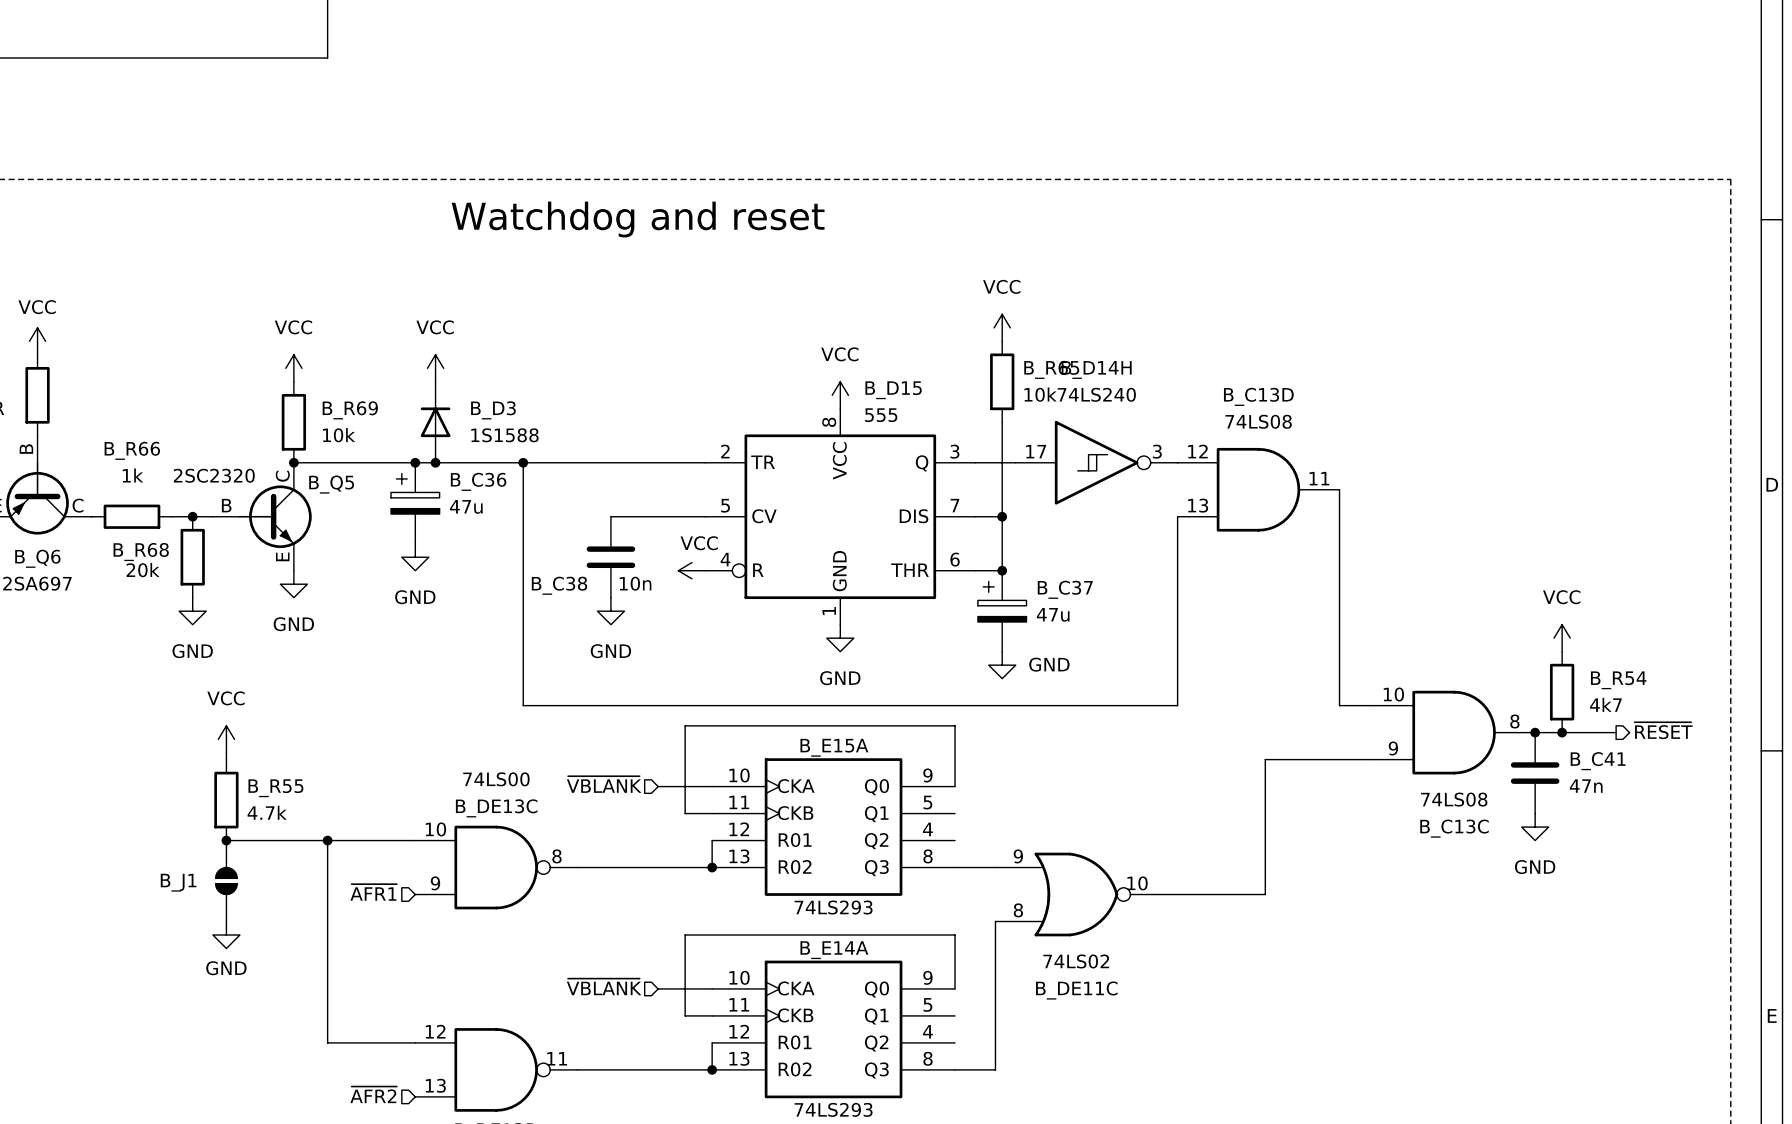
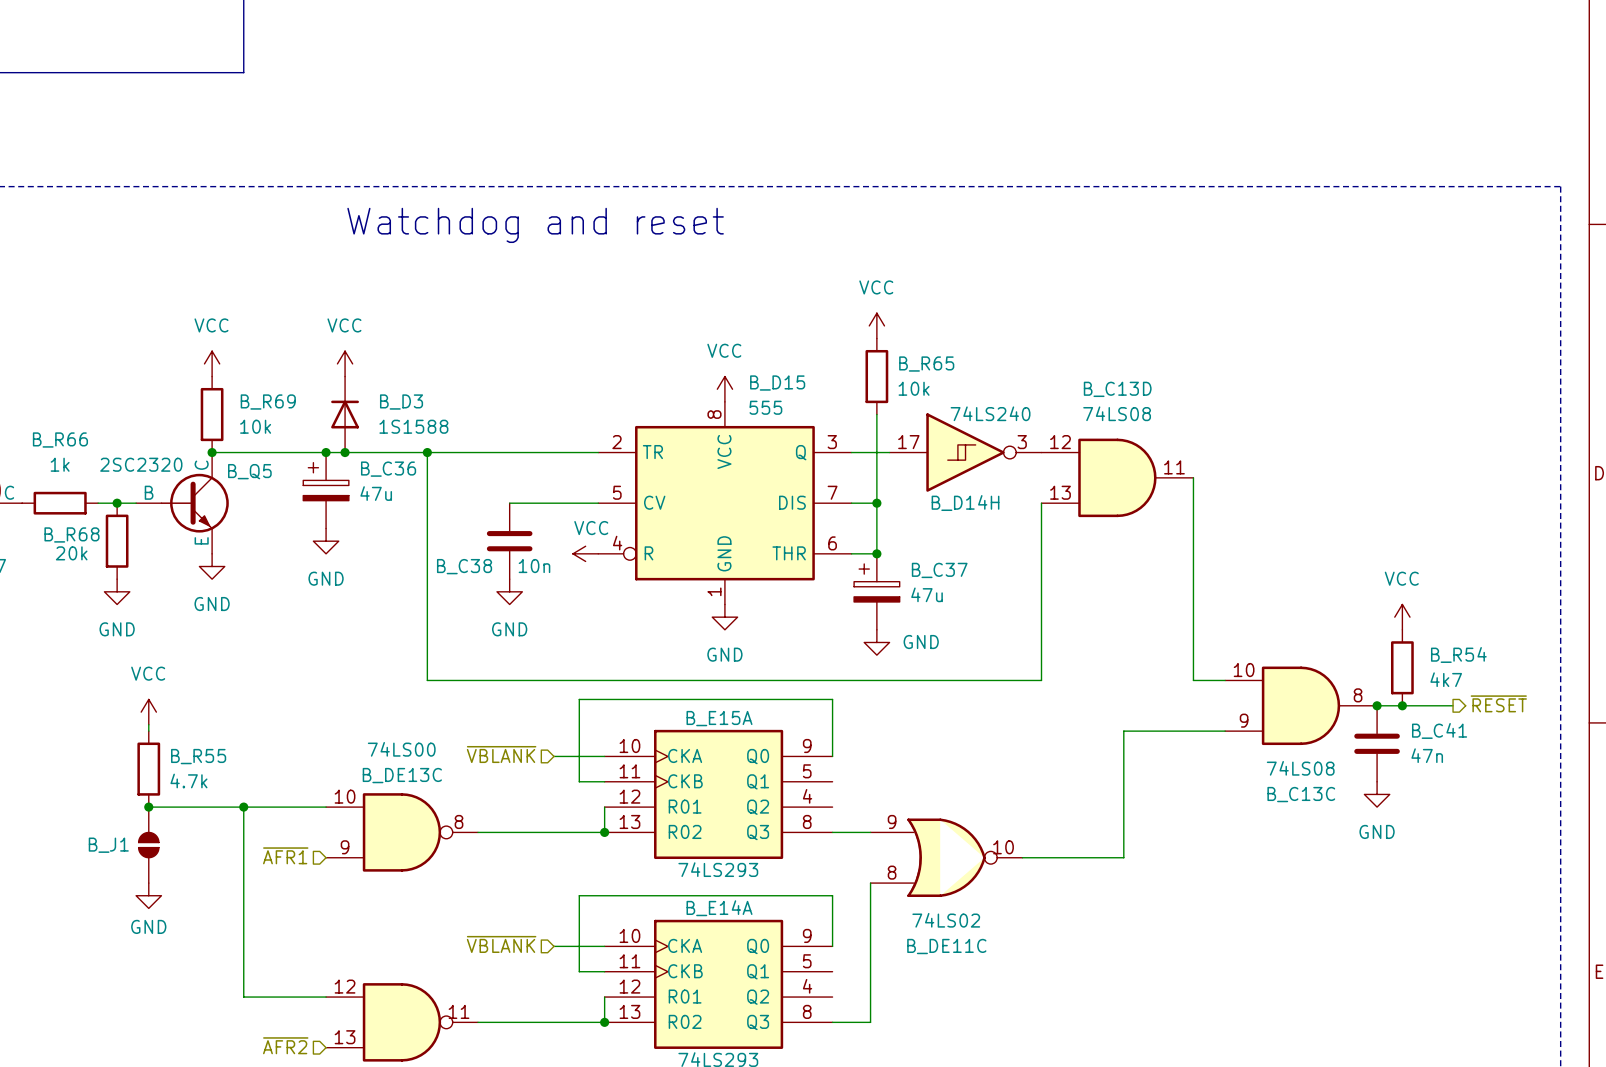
B_D14H name position: B_D14H (1096, 370) -> B_D14H (965, 503)
B_D14H value position: 74LS240 (1096, 394) -> 74LS240 (990, 413)

